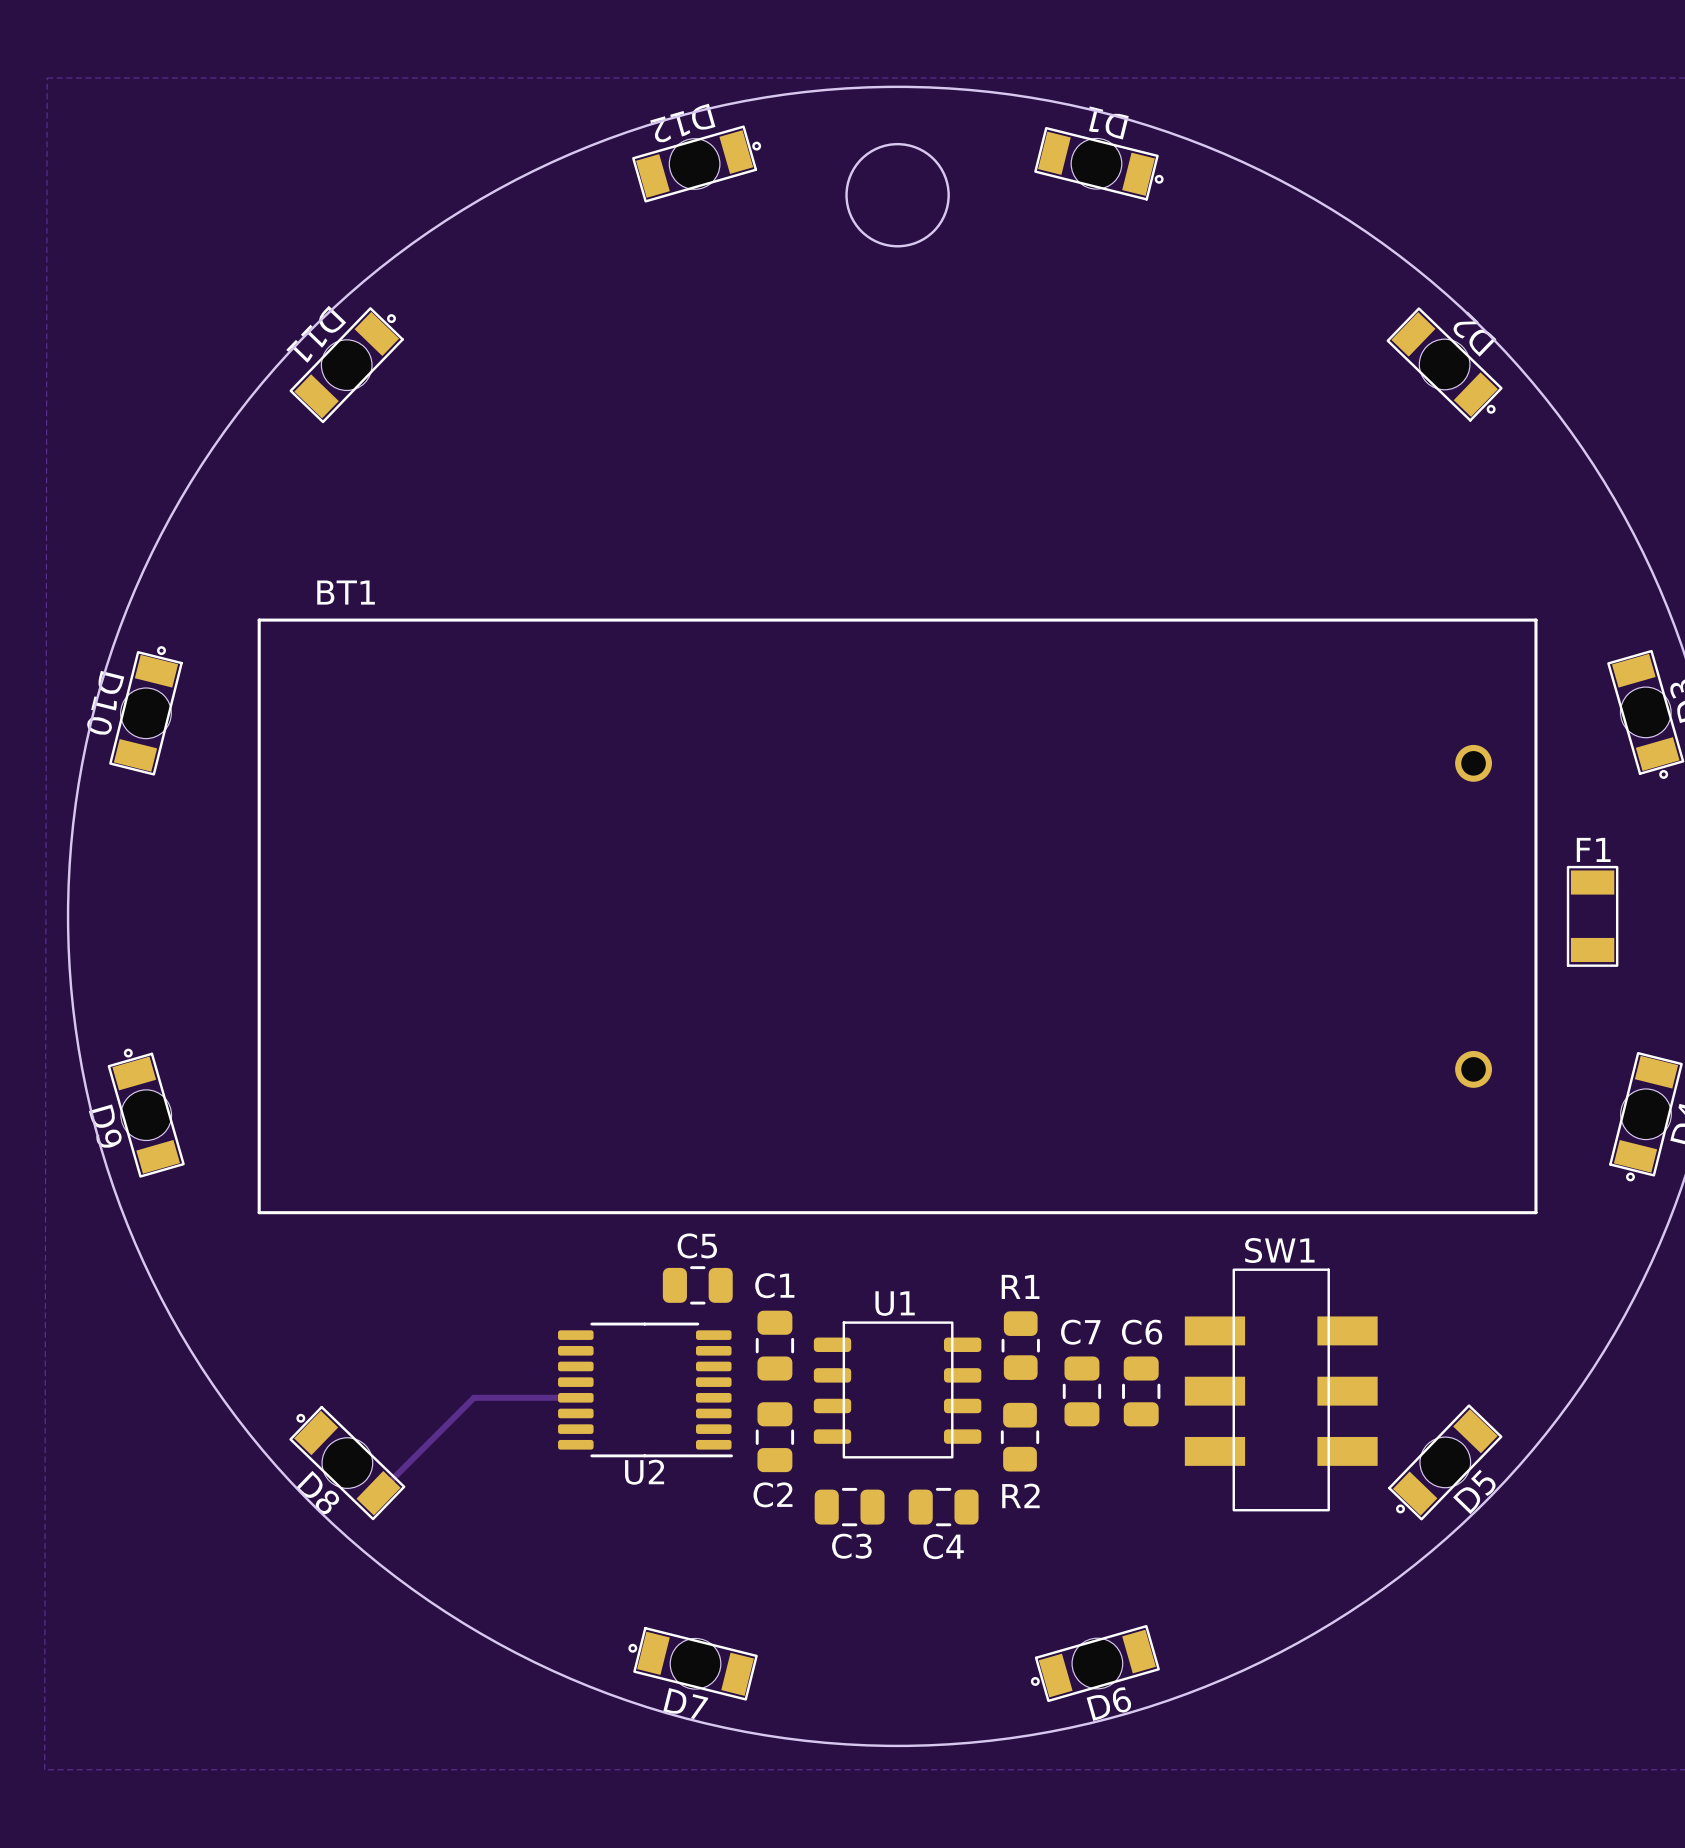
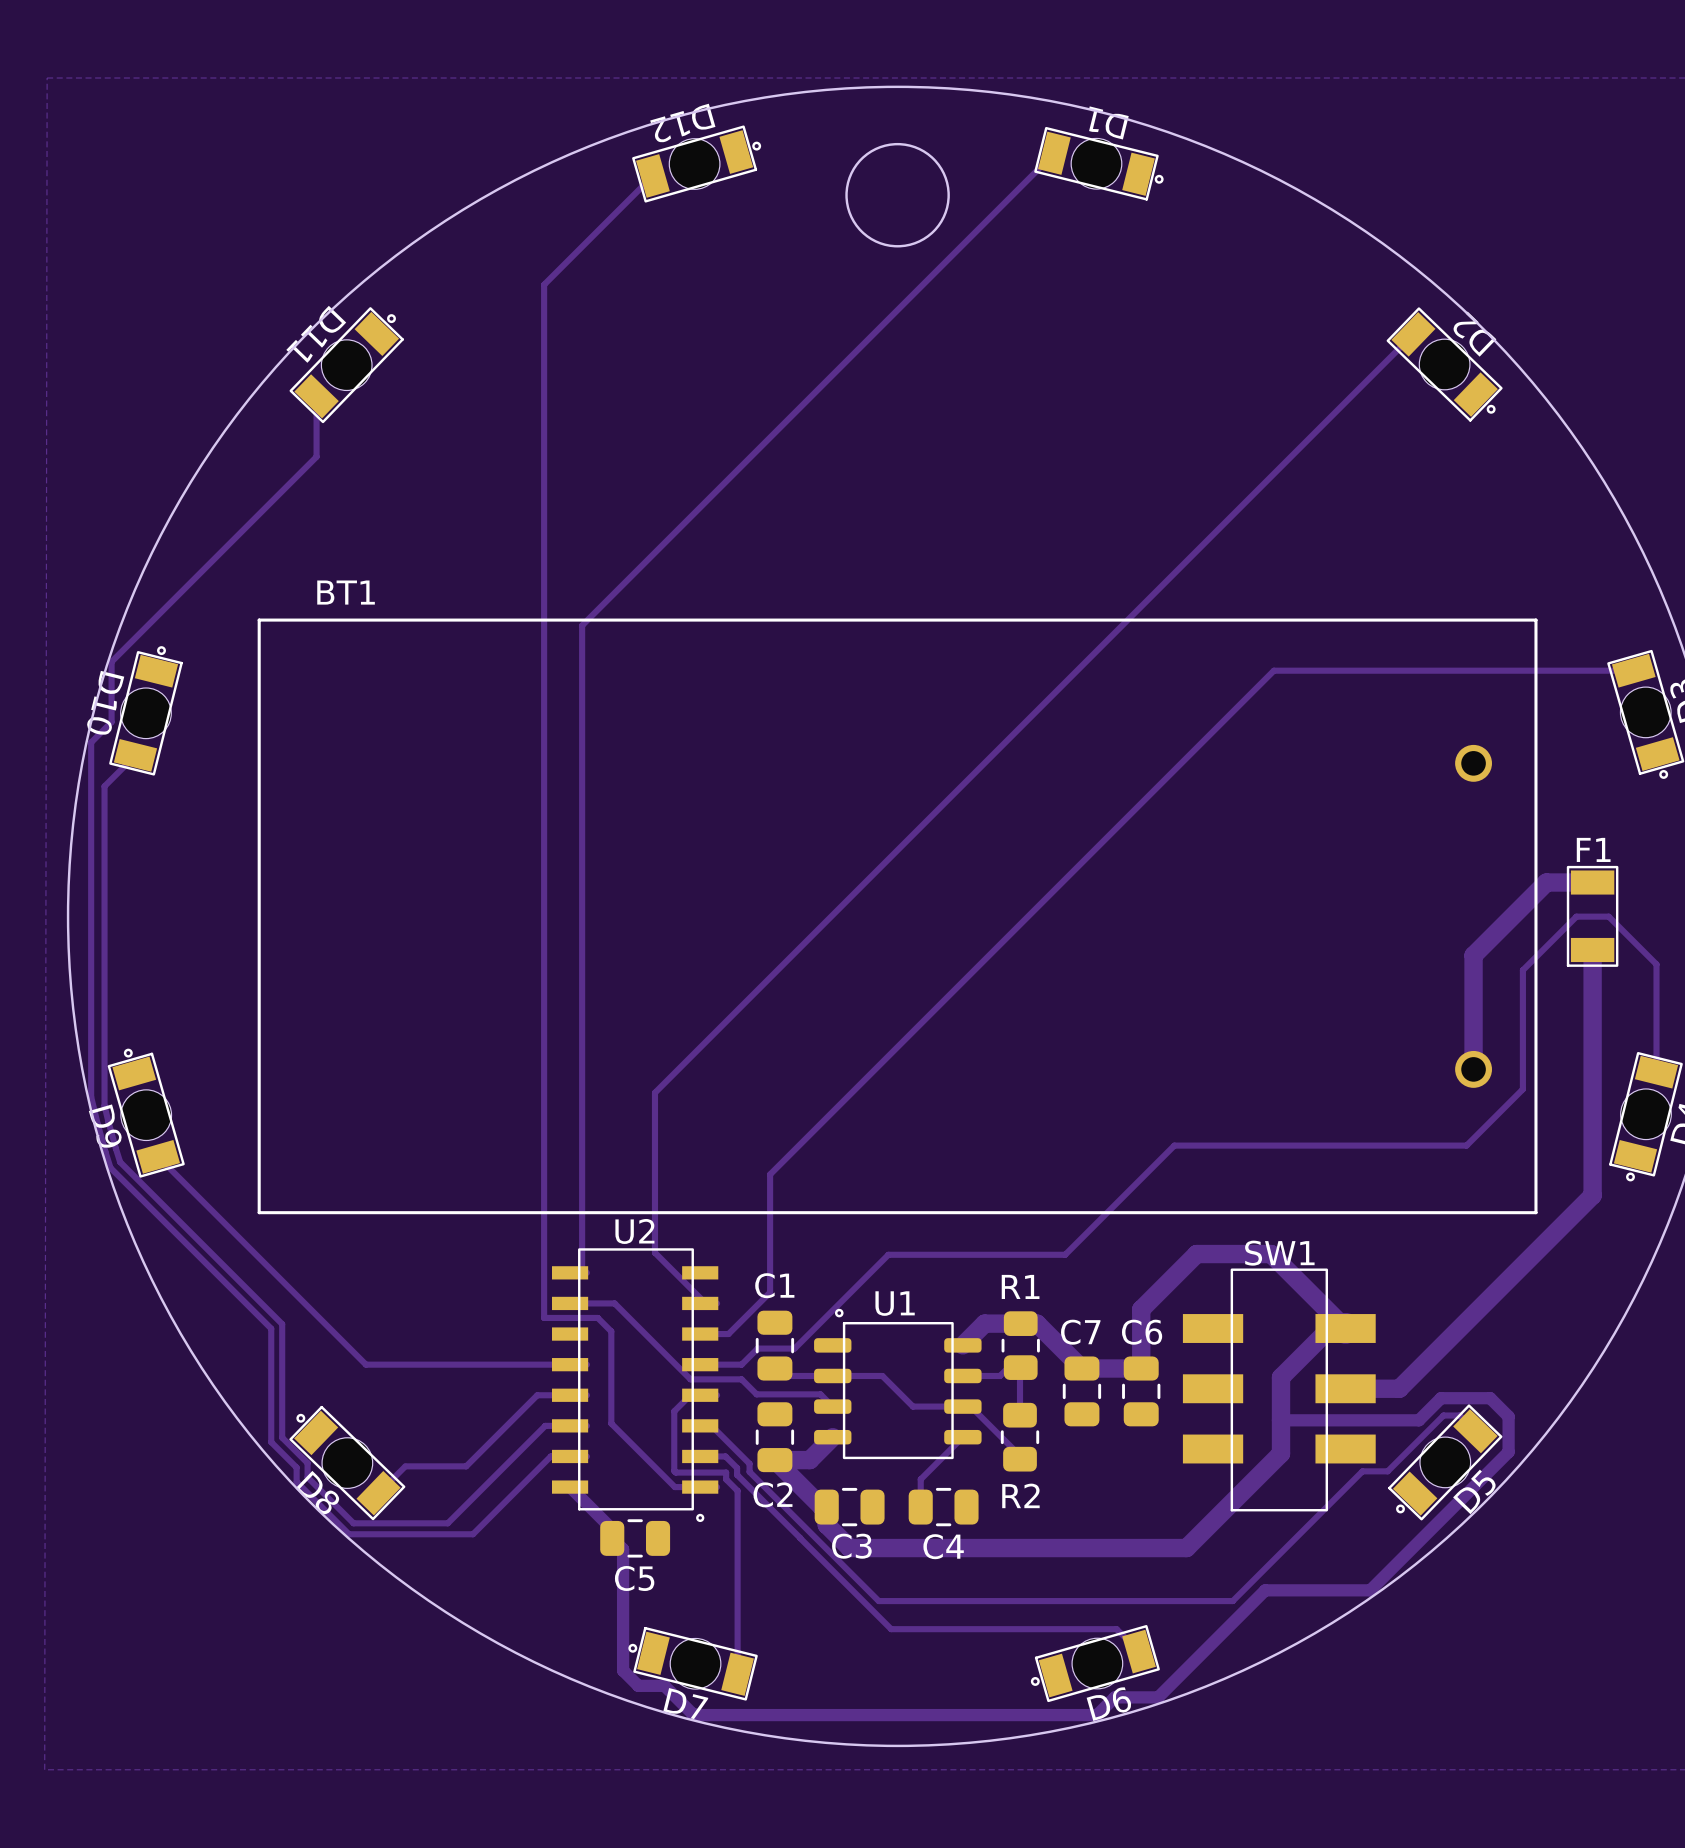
track: none -> (1054, 153) (582, 625) (582, 1268) (586, 1272)
track: none -> (652, 175) (544, 284) (544, 1317) (597, 1317) (611, 1331) (611, 1423) (674, 1487) (717, 1487)
track: none -> (1413, 334) (654, 1092) (654, 1252) (705, 1303) (717, 1303)
track: none -> (316, 396) (316, 456) (111, 661) (111, 722) (91, 742) (91, 1097) (97, 1124) (110, 1167) (271, 1328) (271, 1442) (296, 1467) (296, 1481) (349, 1534) (473, 1534) (550, 1456) (586, 1456)
track: none -> (1633, 670) (1273, 670) (770, 1174) (770, 1292) (728, 1334) (717, 1334)
track: none -> (135, 755) (104, 786) (104, 1105) (120, 1162) (282, 1324) (282, 1437) (307, 1463) (307, 1477) (353, 1523) (447, 1523) (545, 1425) (586, 1425)
track: none -> (1592, 882) (1546, 882) (1473, 955) (1473, 1069)
track: none -> (1592, 949) (1592, 1195) (1399, 1388) (1345, 1388)
track: none -> (1656, 1072) (1656, 964) (1608, 916) (1576, 916) (1522, 970) (1522, 1089) (1466, 1145) (1174, 1145) (1065, 1254) (888, 1254) (794, 1348) (757, 1348) (741, 1364) (717, 1364)
track: none -> (158, 1156) (365, 1364) (586, 1364)
C5 name position: C5 (697, 1245) -> C5 (634, 1578)
C5 position: (697, 1285) -> (635, 1538)
track: none -> (586, 1303) (614, 1303) (690, 1379) (741, 1379) (756, 1394) (820, 1394) (832, 1406)
U1 footprint: [813, 1321, 982, 1459] -> [814, 1308, 982, 1460]
U2 footprint: [558, 1322, 733, 1458] -> [552, 1248, 719, 1523]
track: none -> (962, 1345) (984, 1323) (1037, 1323) (1081, 1368) (1141, 1368) (1141, 1309) (1196, 1254) (1271, 1254) (1345, 1328) (1329, 1328) (1281, 1377) (1281, 1453) (1186, 1548) (849, 1548) (826, 1524) (826, 1507) (821, 1507) (774, 1460) (809, 1460) (832, 1437)
track: none -> (774, 1368) (782, 1375) (882, 1375) (913, 1406) (970, 1406) (1020, 1455) (1020, 1459)
track: none -> (962, 1375) (1000, 1375) (1008, 1367) (1020, 1367) (1020, 1415)
SW1 rotation: 0° (1281, 1389) -> 180° (1279, 1389)
track: none -> (717, 1395) (690, 1395) (674, 1411) (674, 1470) (675, 1472) (726, 1472) (726, 1479) (737, 1490) (737, 1674)
track: (575, 1397) (473, 1397) (405, 1466) -> (586, 1395) (537, 1395) (466, 1466) (405, 1466)
track: none -> (1281, 1420) (1418, 1420) (1441, 1398) (1490, 1398) (1508, 1416) (1508, 1452) (1370, 1590) (1265, 1590) (1158, 1697) (1114, 1697) (1097, 1715) (692, 1713) (664, 1685) (638, 1685) (623, 1670) (623, 1549) (612, 1538) (612, 1529) (570, 1487)
track: none -> (700, 1425) (711, 1425) (749, 1463) (749, 1471) (878, 1601) (1232, 1601) (1362, 1471) (1387, 1471) (1443, 1415) (1459, 1415) (1475, 1431)
track: none -> (962, 1437) (920, 1479) (920, 1507)
track: none -> (705, 1456) (725, 1456) (737, 1468) (737, 1474) (800, 1537)
U2 name position: U2 (644, 1472) -> U2 (634, 1231)
track: none -> (800, 1538) (891, 1629) (1116, 1629) (1139, 1651) (1139, 1637)

